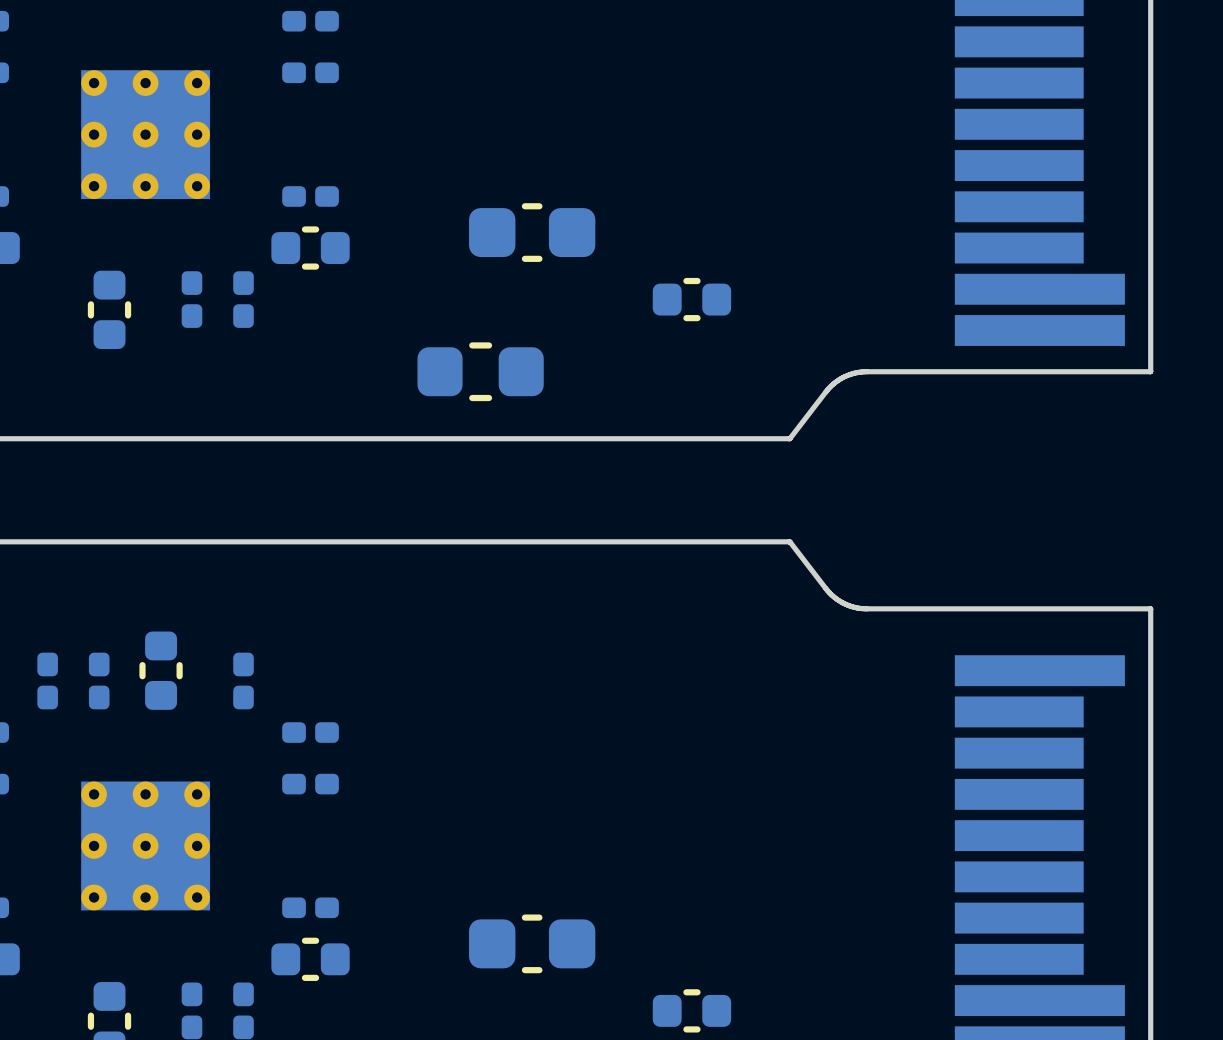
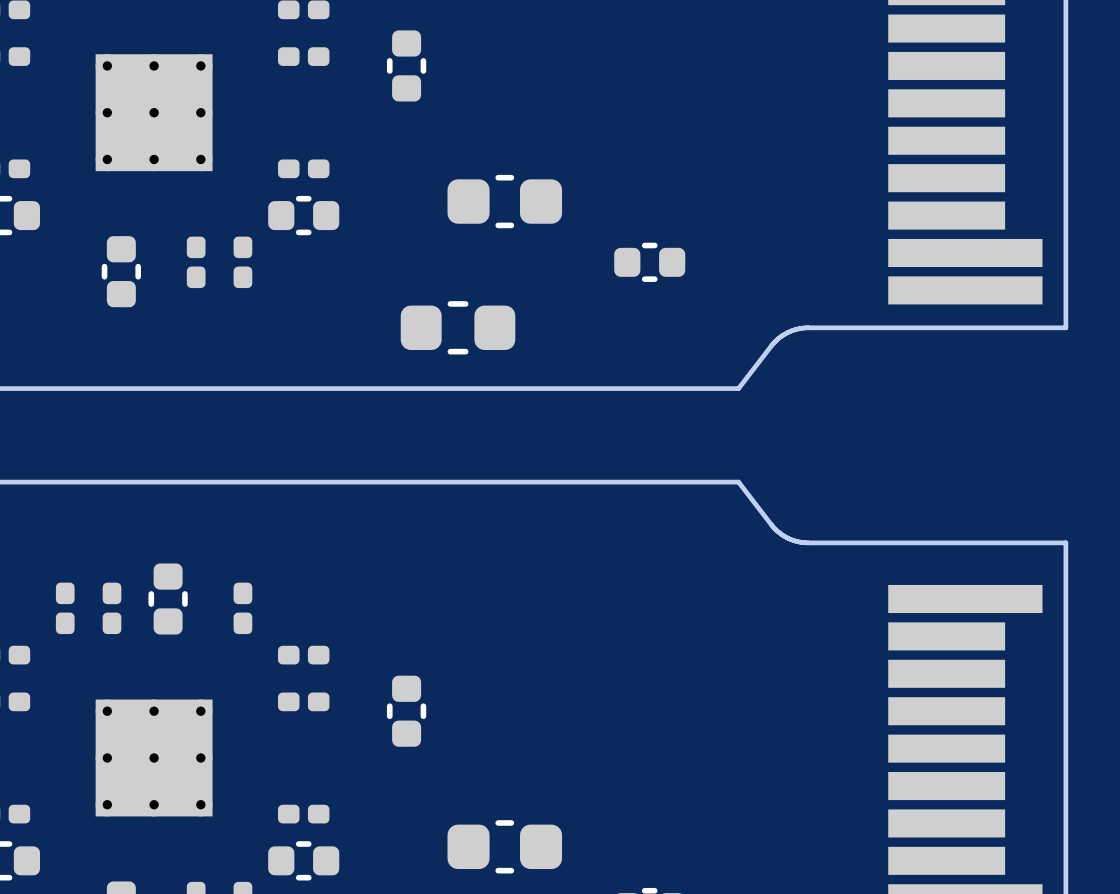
part: none -> (406, 65)
part: none -> (406, 711)

